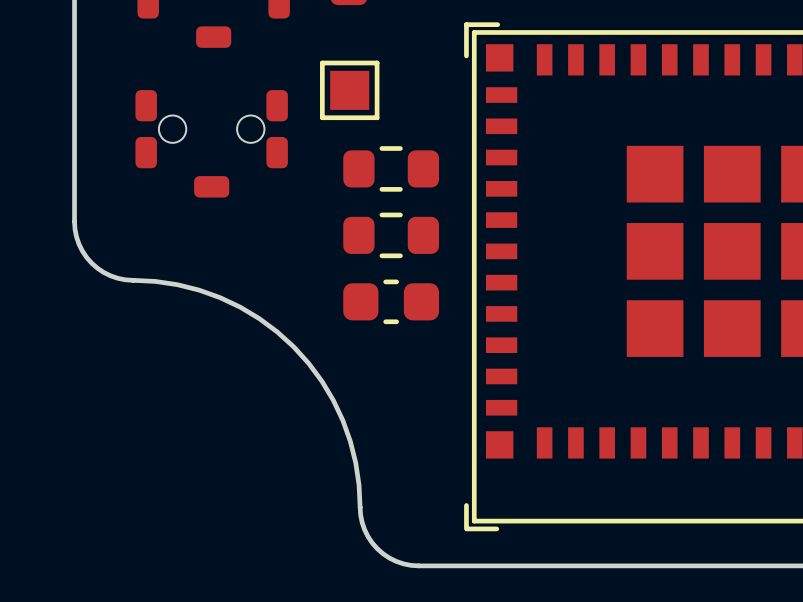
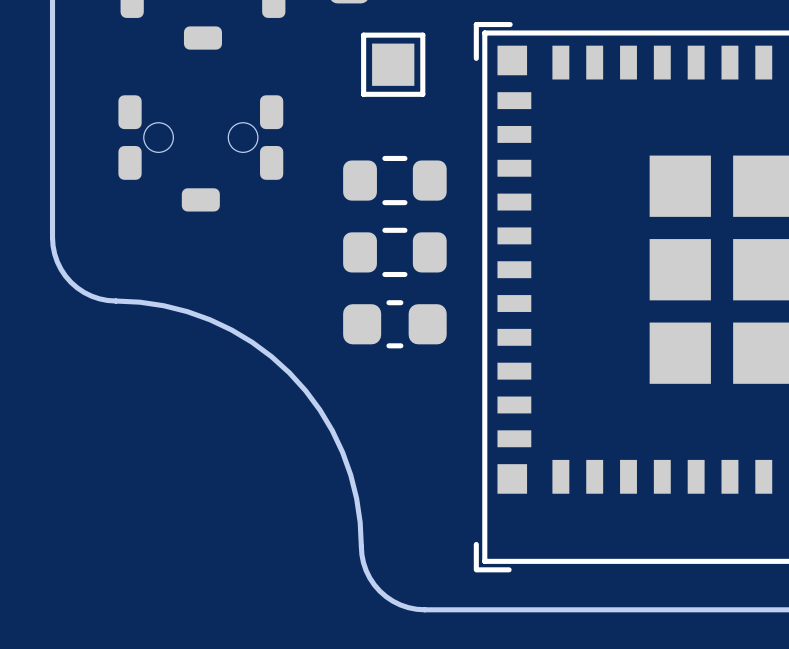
part position: (349, 90) -> (393, 64)

